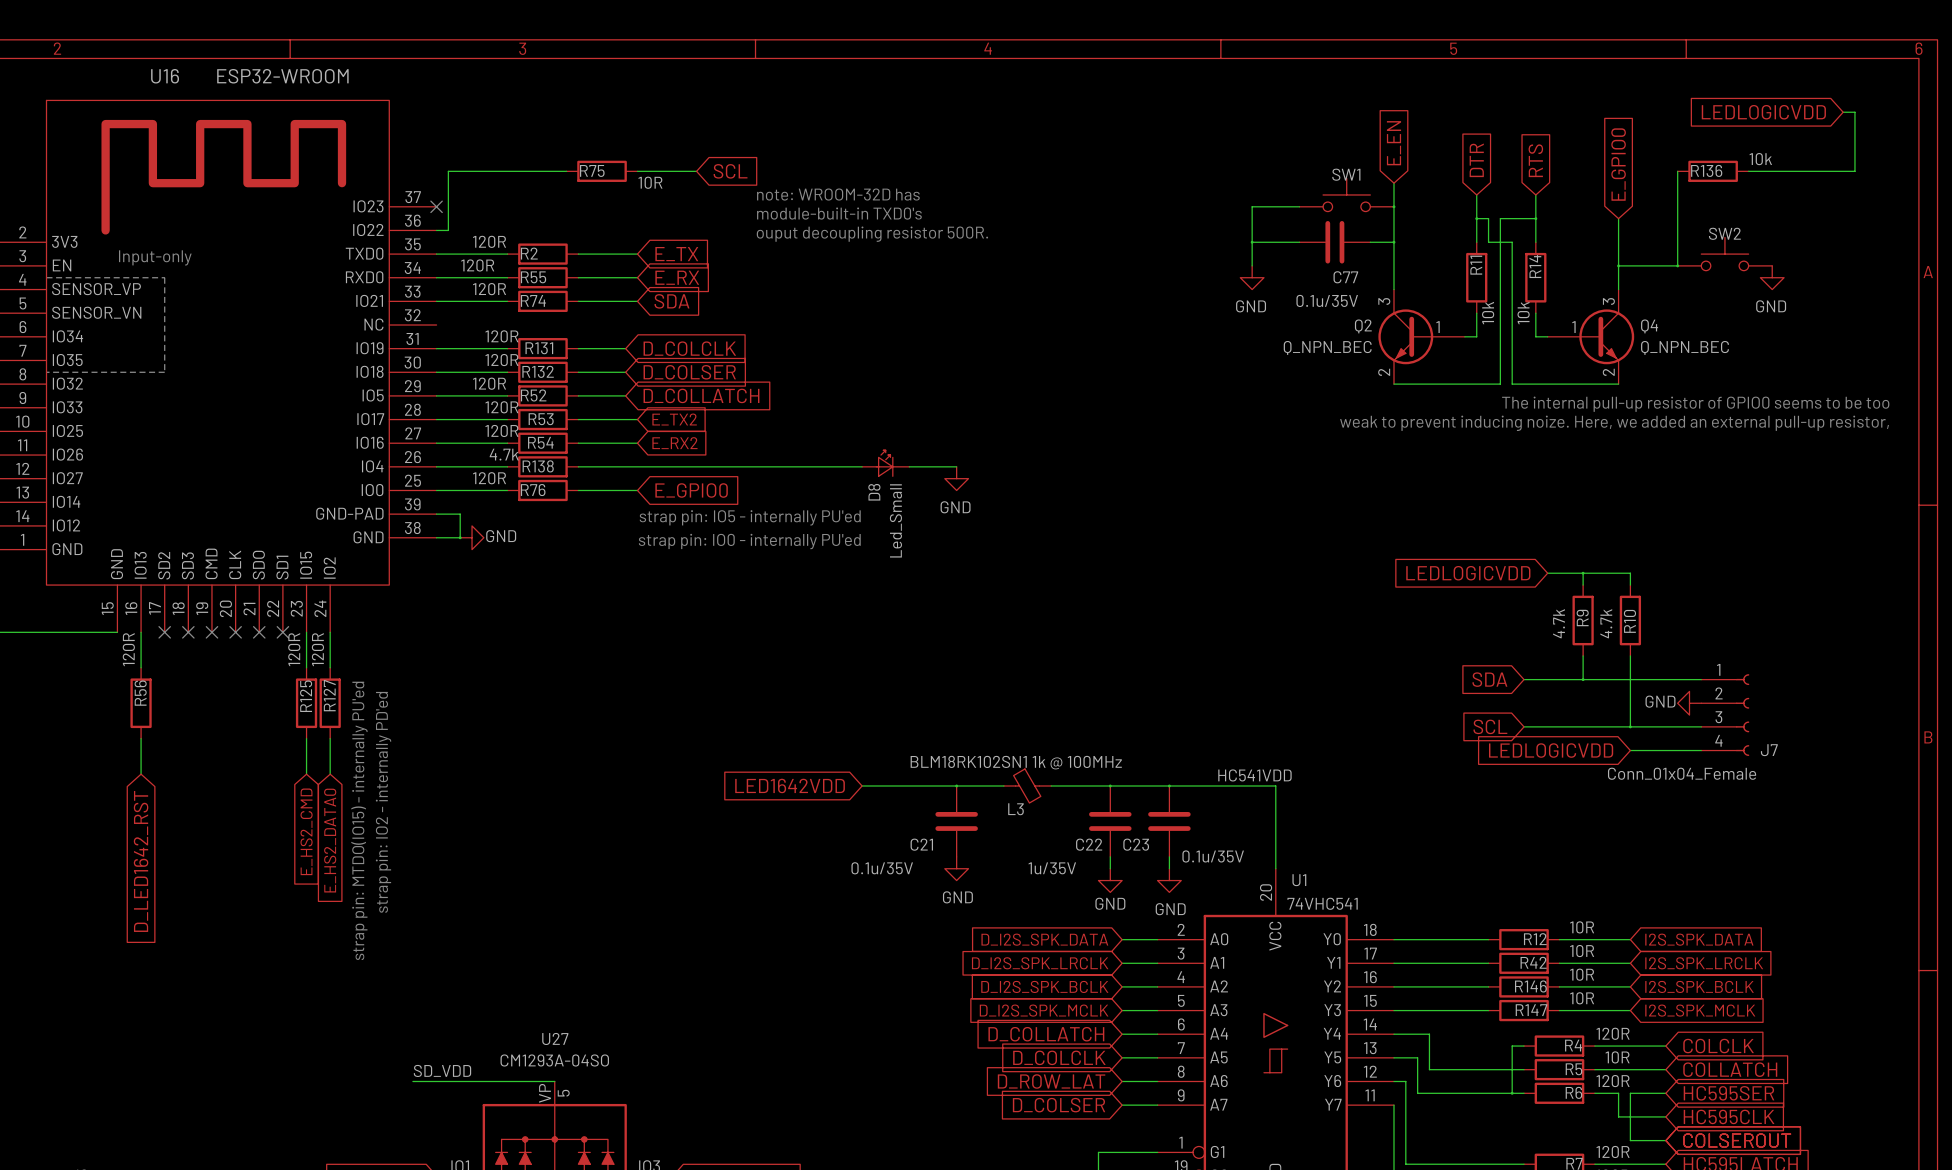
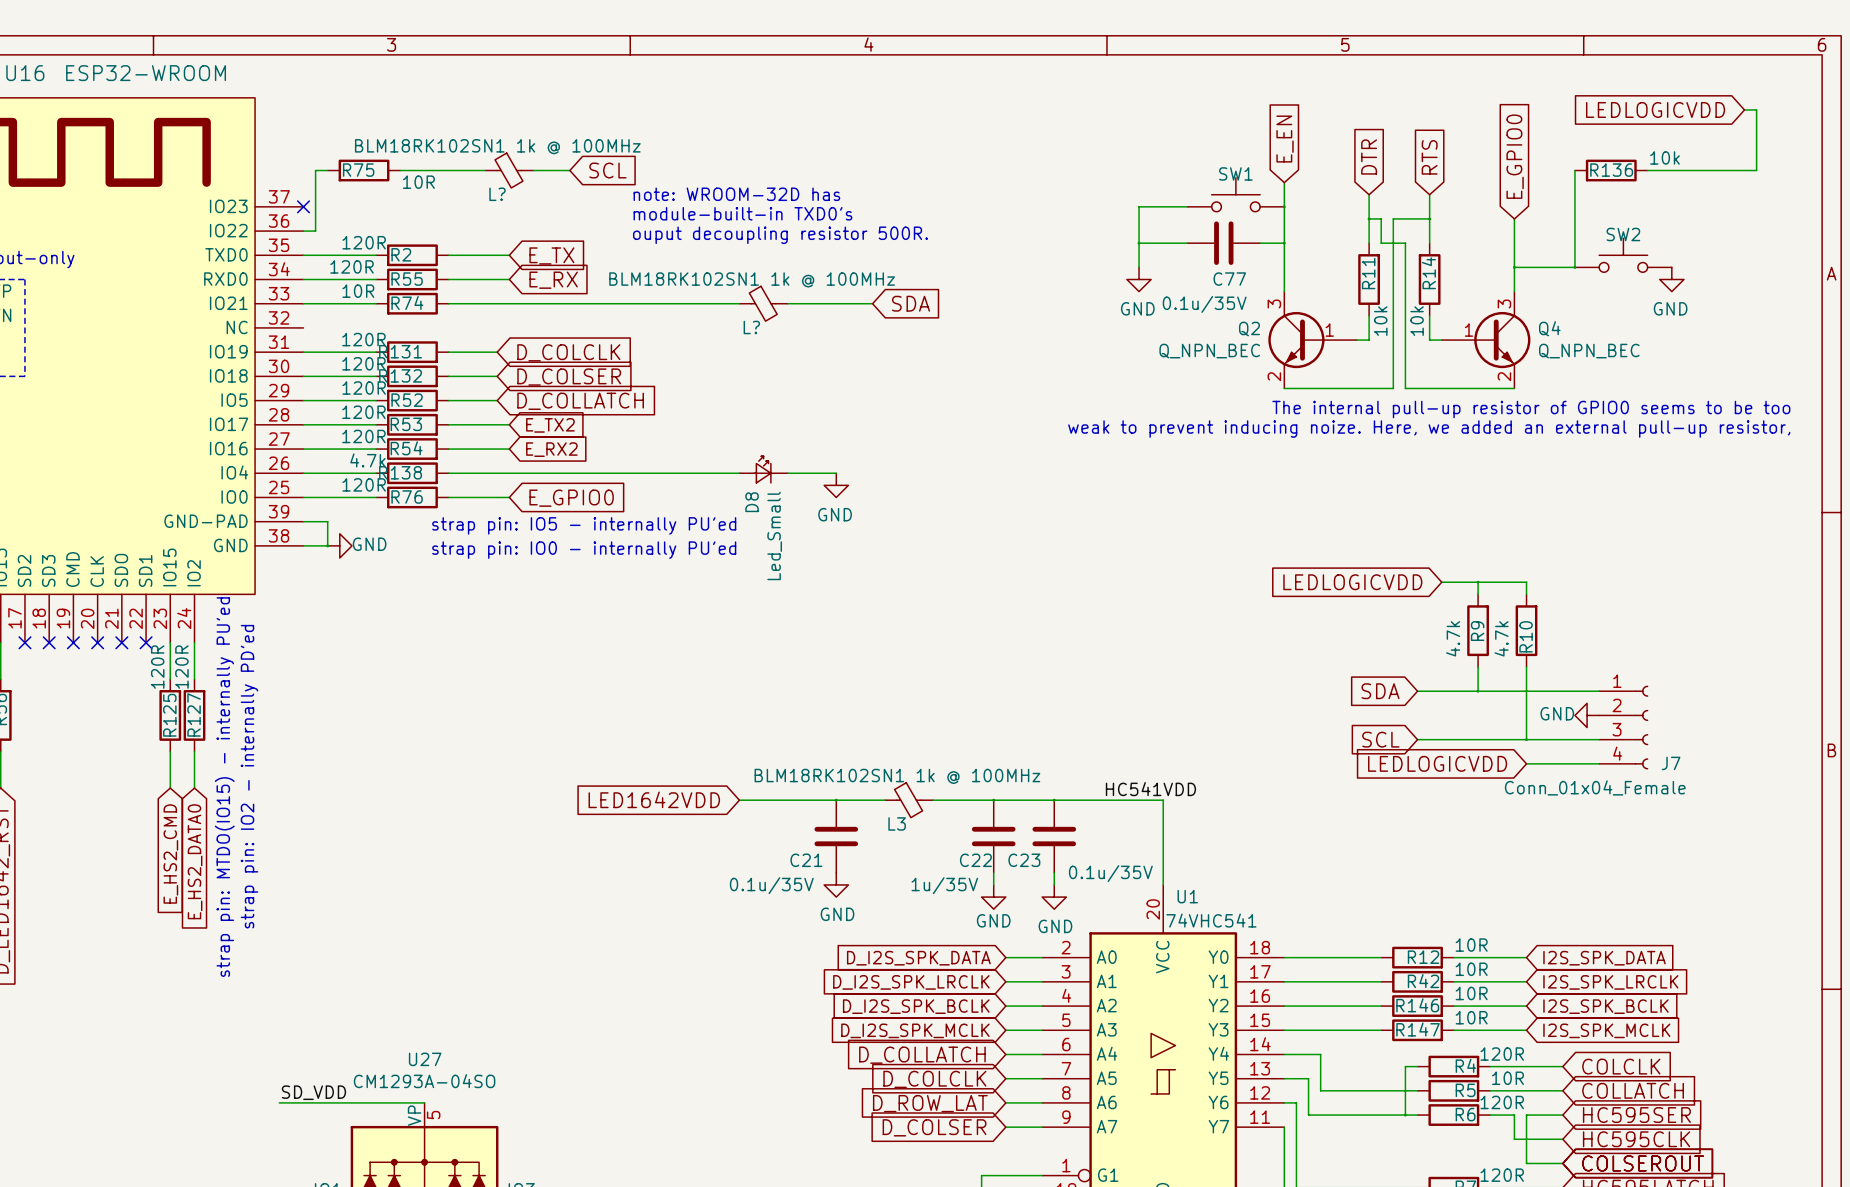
wire: (460, 171) (531, 171) -> none
wire: none -> (436, 170) (485, 170)
R75 position: (602, 171) -> (364, 170)
L?: none -> BLM18RK102SN1 1k @ 100MHz (509, 170)
R74 value: 120R (489, 289) -> 10R (358, 291)
wire: none -> (509, 303) (739, 303)
global label: SDA (671, 301) -> none
L?: none -> BLM18RK102SN1 1k @ 100MHz (763, 303)
wire: none -> (787, 303) (872, 303)
global label: none -> SDA (911, 303)

